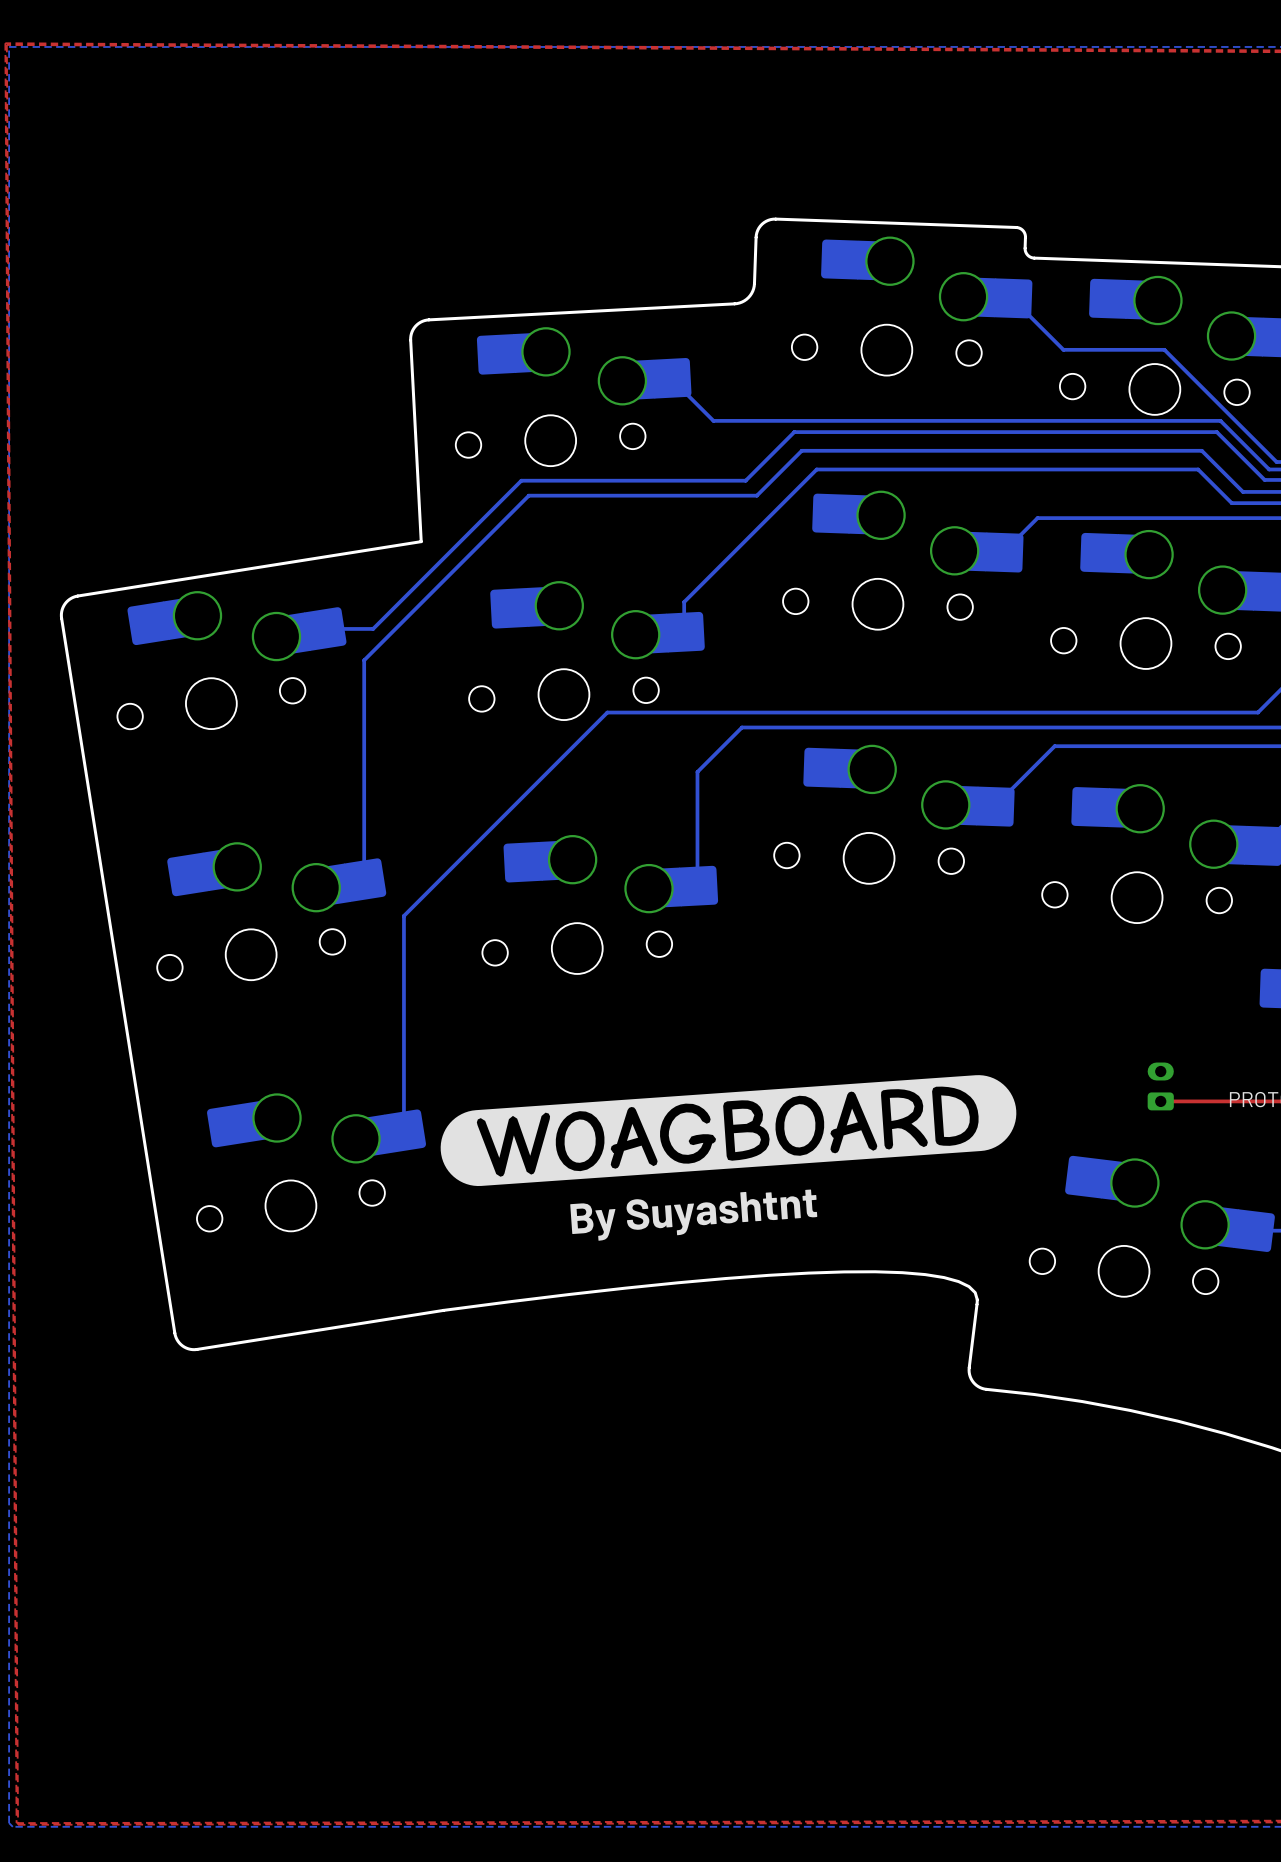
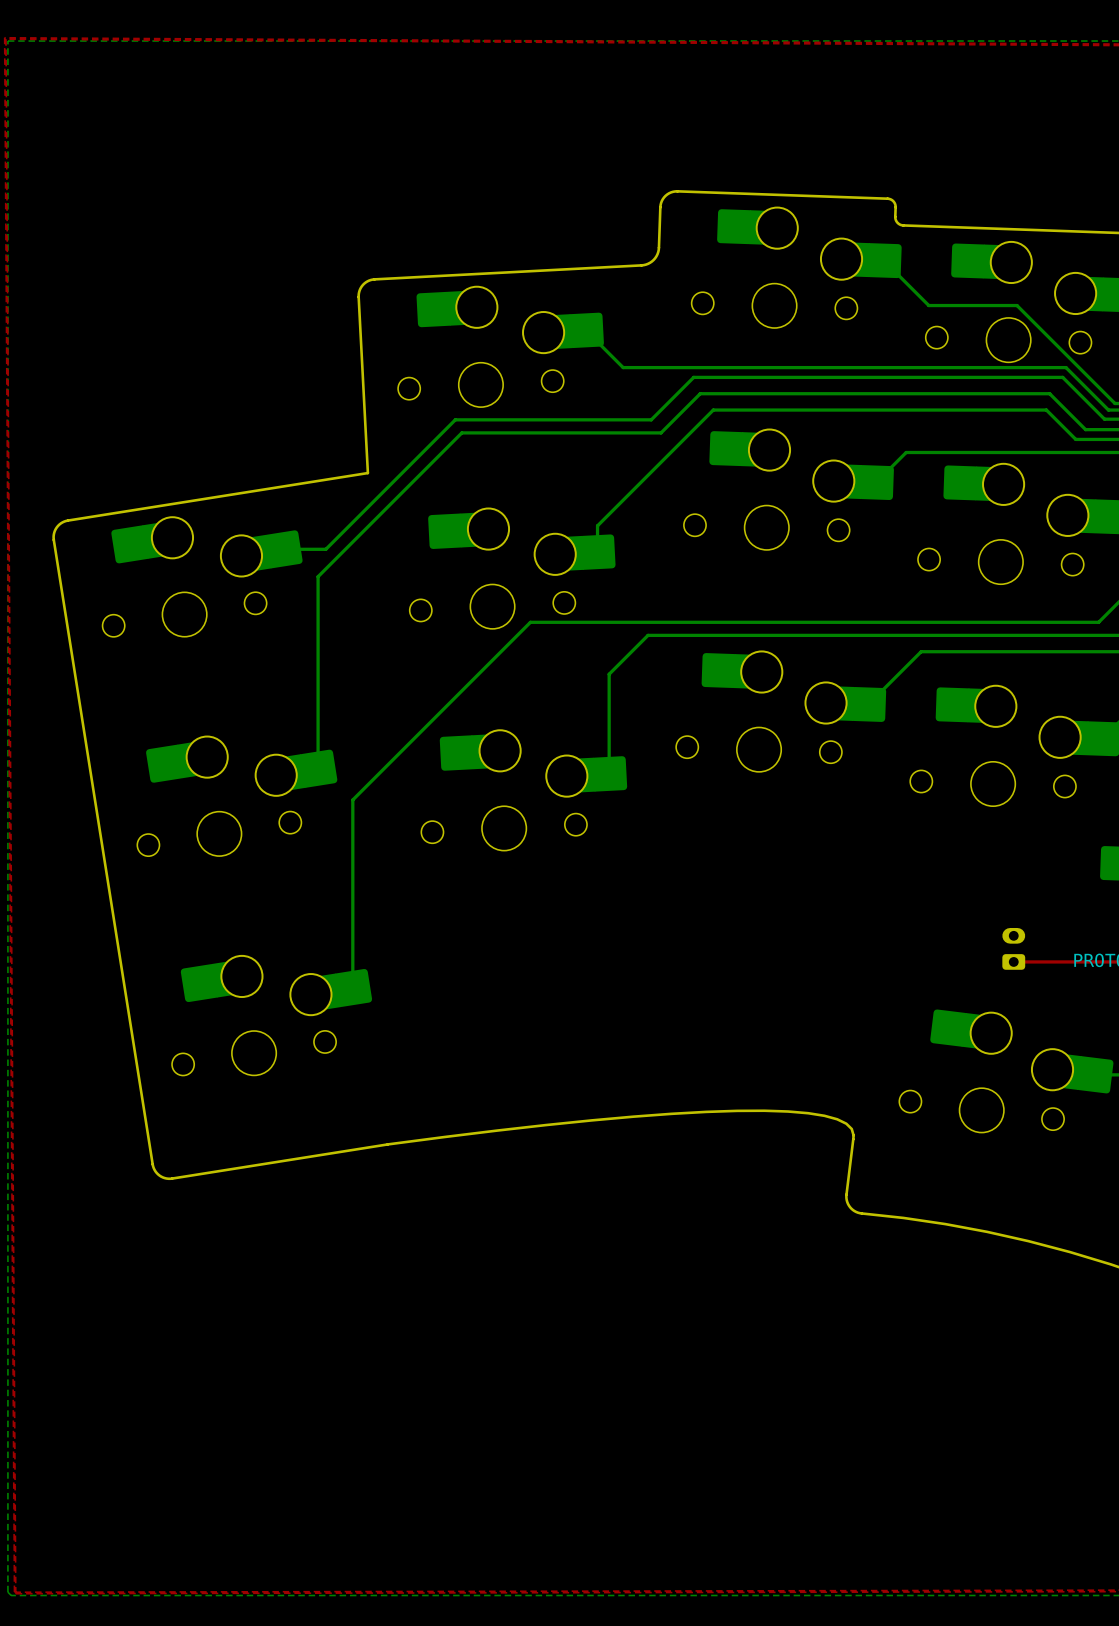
drawing: [440, 1075, 1017, 1187] -> none
text: By Suyashtnt (693, 1215) -> none

